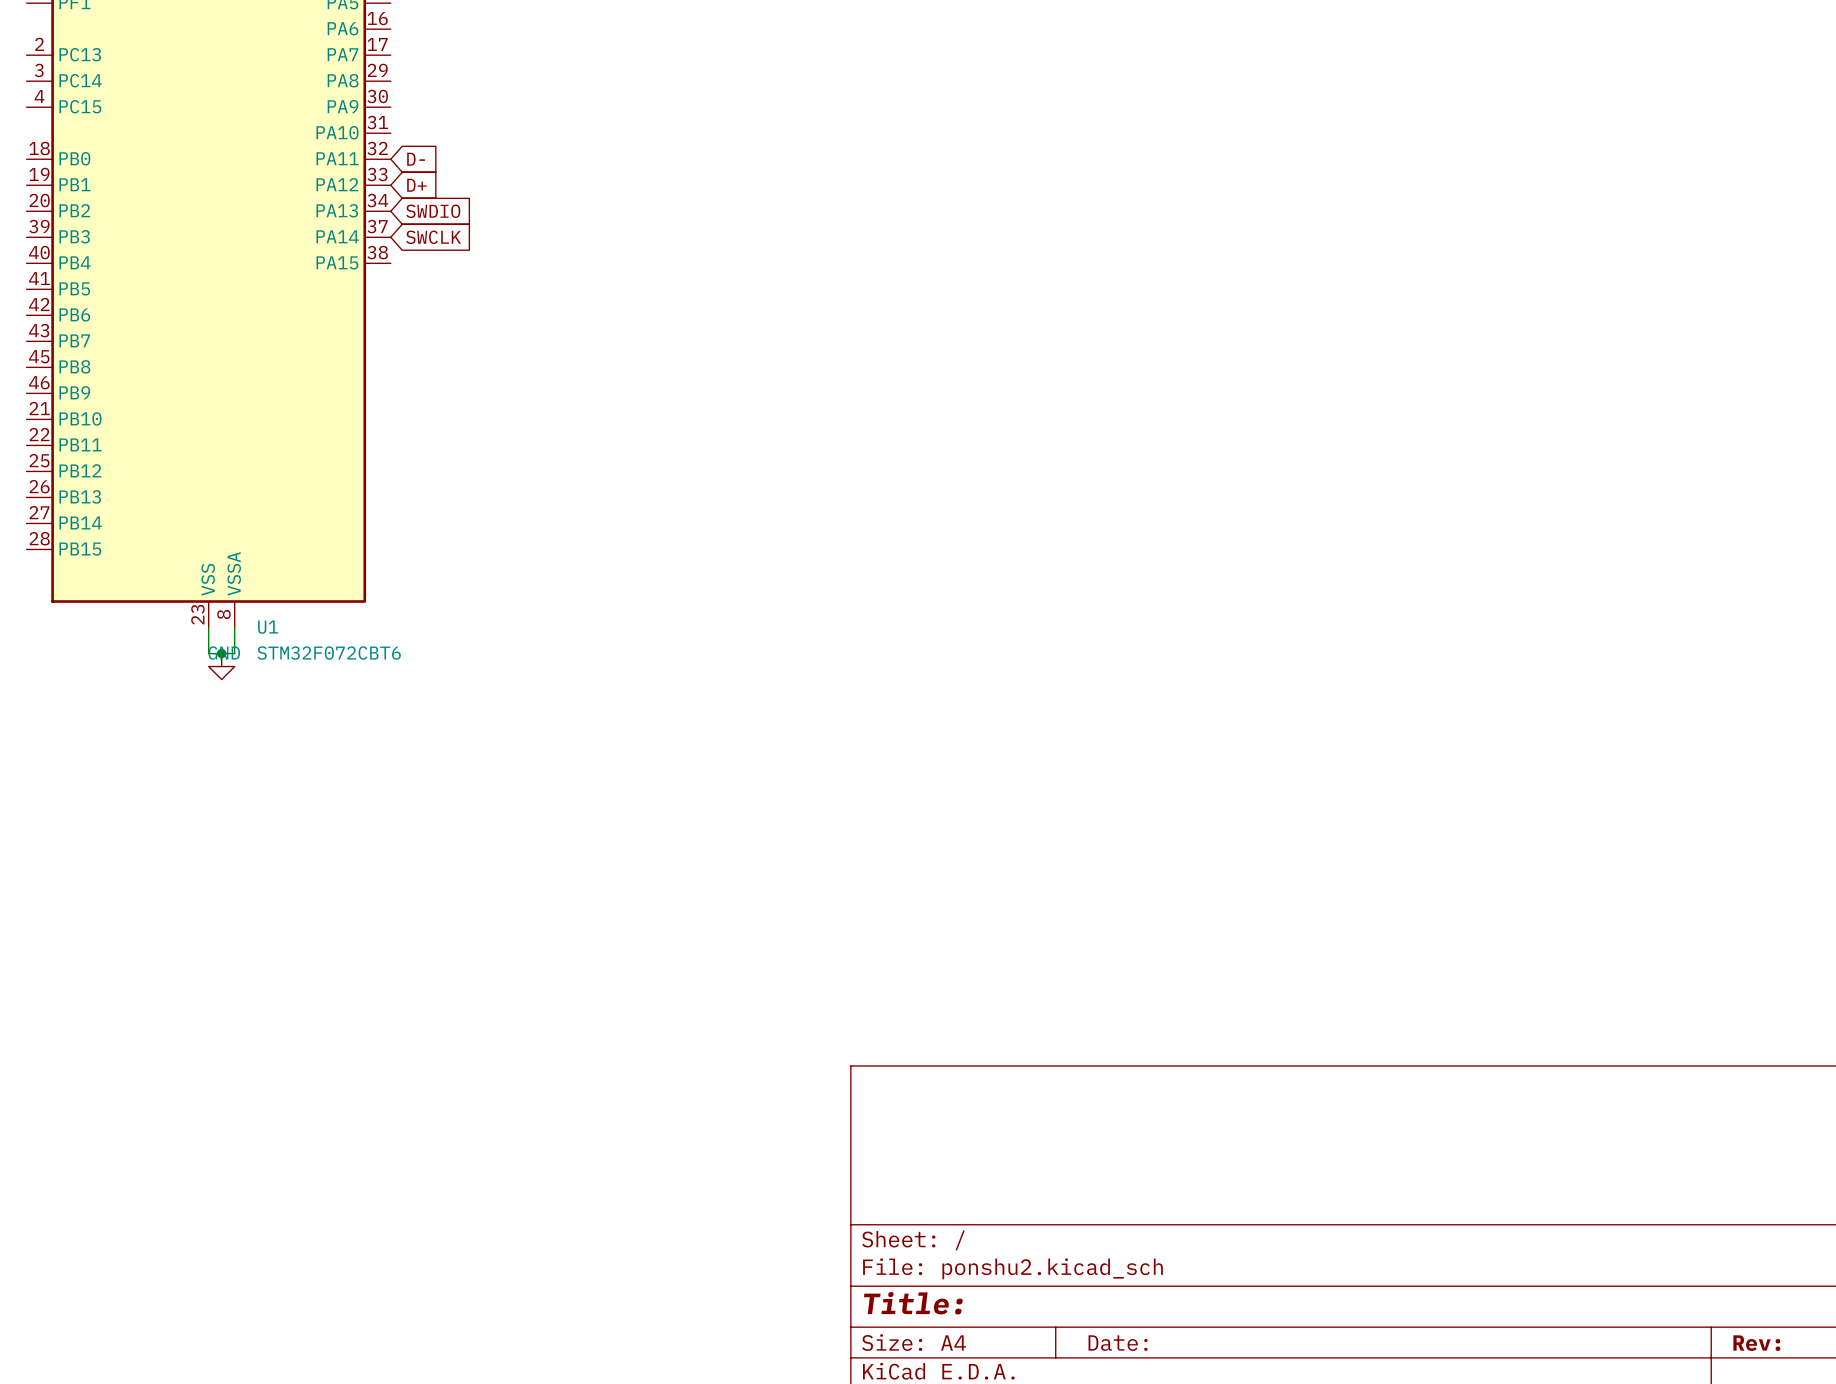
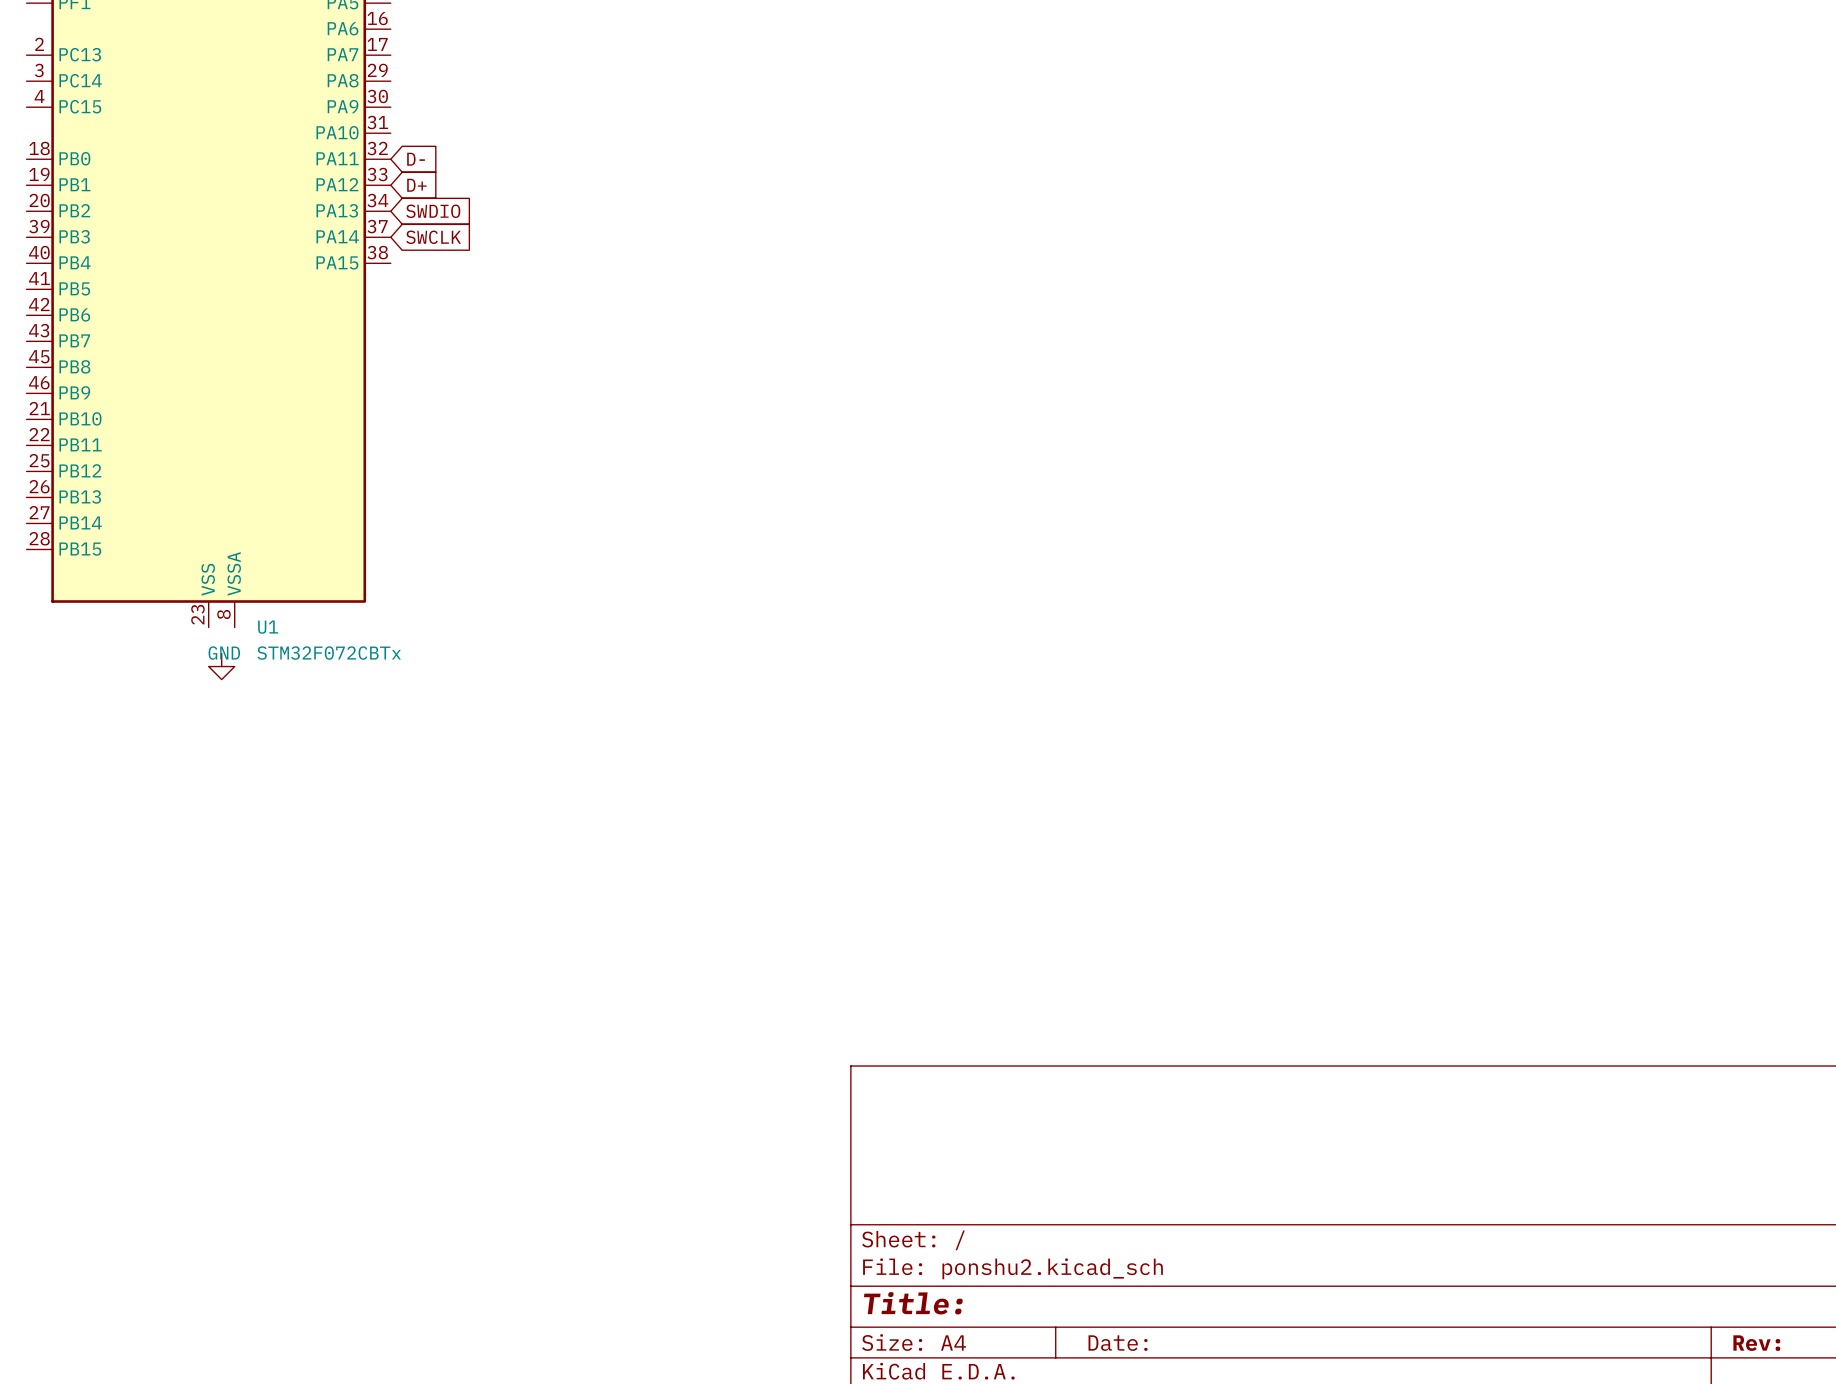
wire: (208, 627) (208, 653) (234, 653) (234, 627) -> none
junction: (221, 653) -> none
U1 value: STM32F072CBT6 (329, 653) -> STM32F072CBTx (329, 653)

